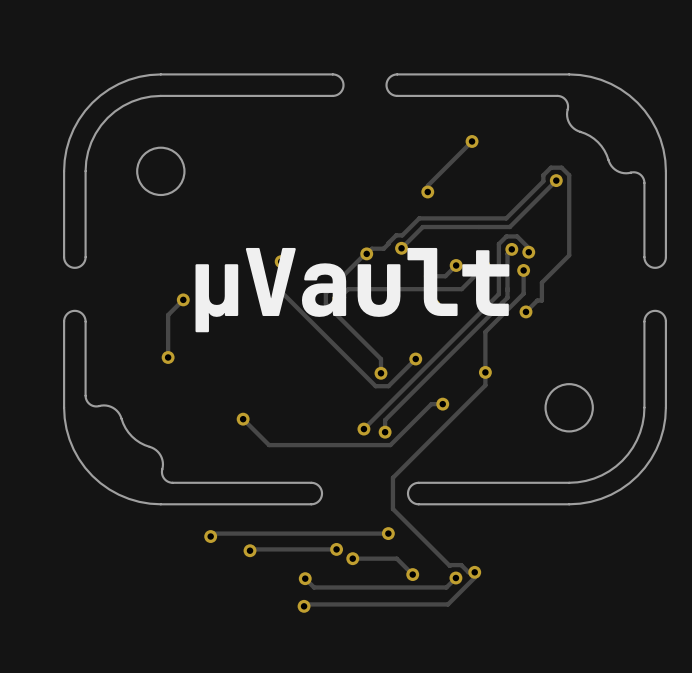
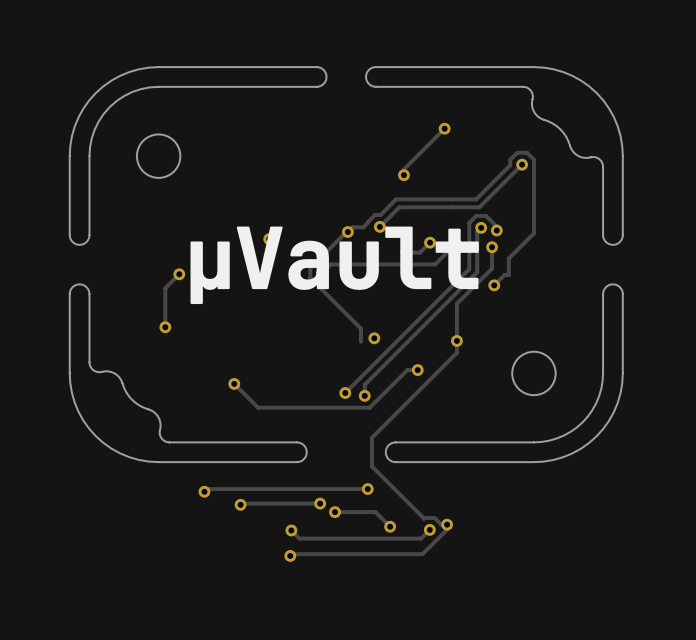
track: (281, 261) (281, 291) (375, 386) (388, 386) (415, 359) -> none
via: (415, 359) -> none
via: none -> (374, 338)
via: (380, 373) -> none

